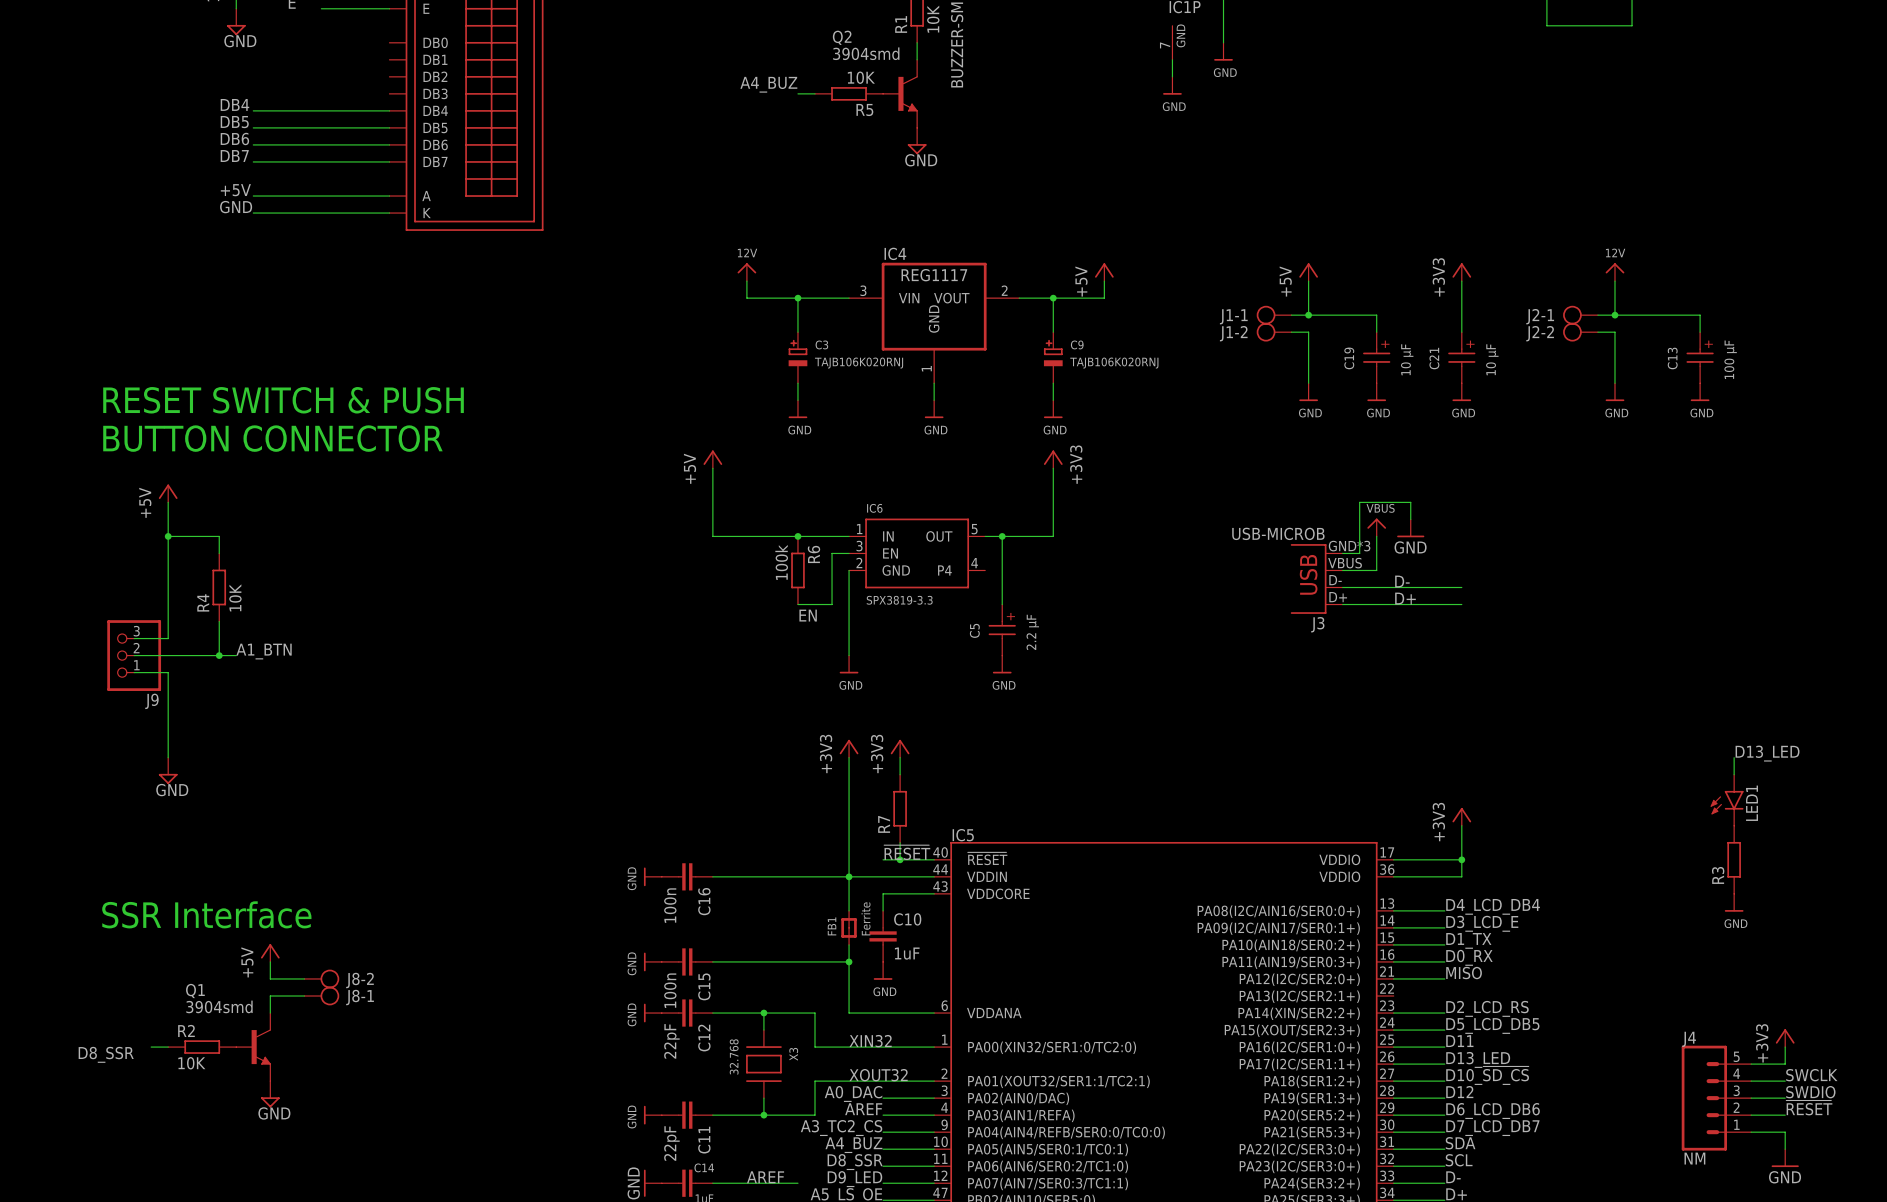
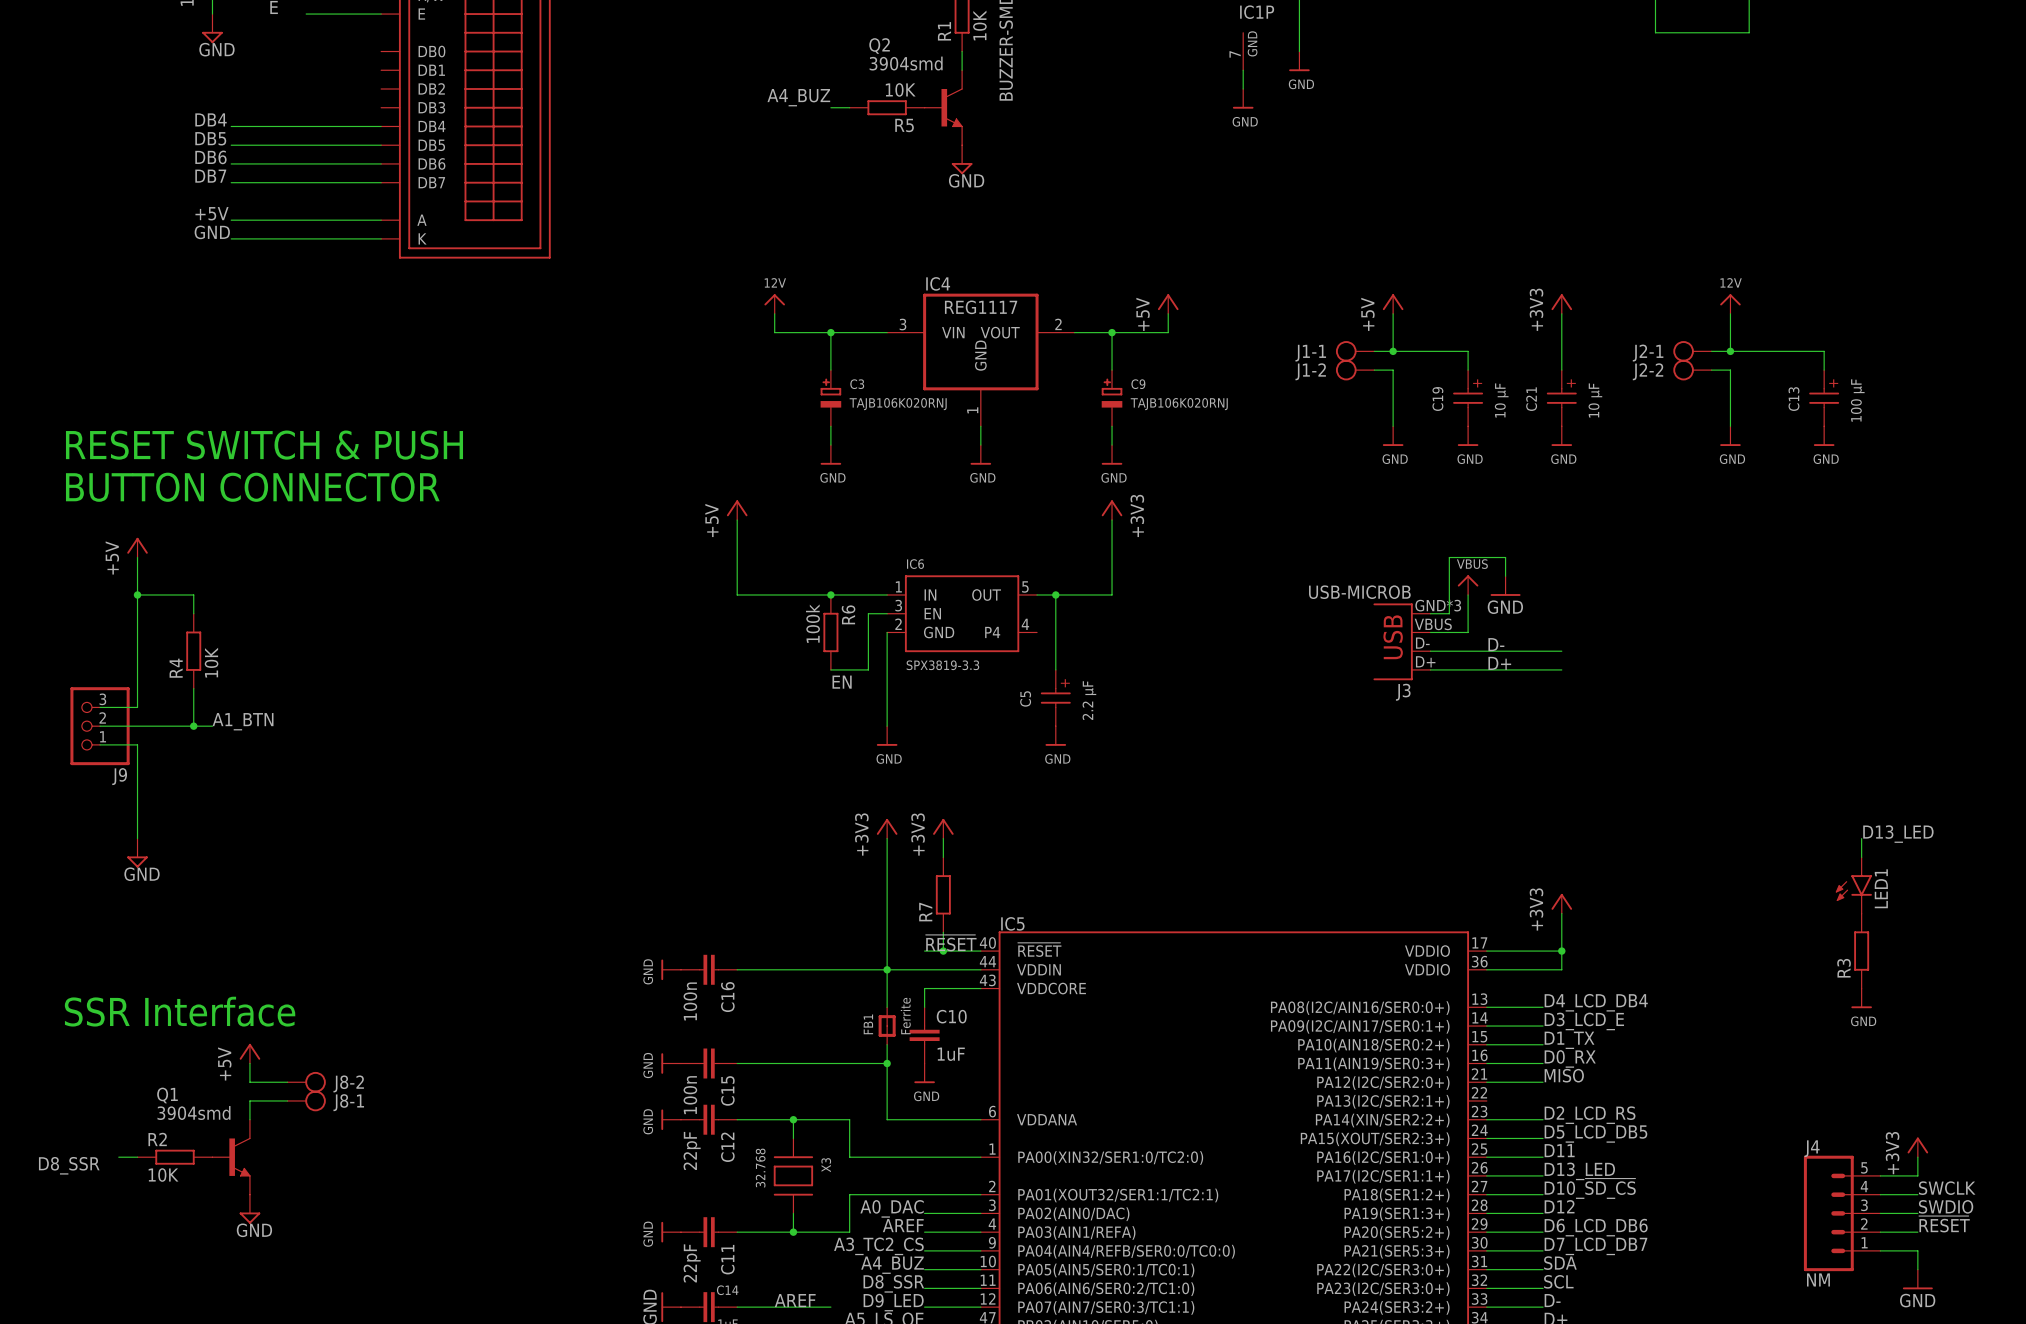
label: XIN32 (870, 1041) -> none
label: XOUT32 (878, 1075) -> none

